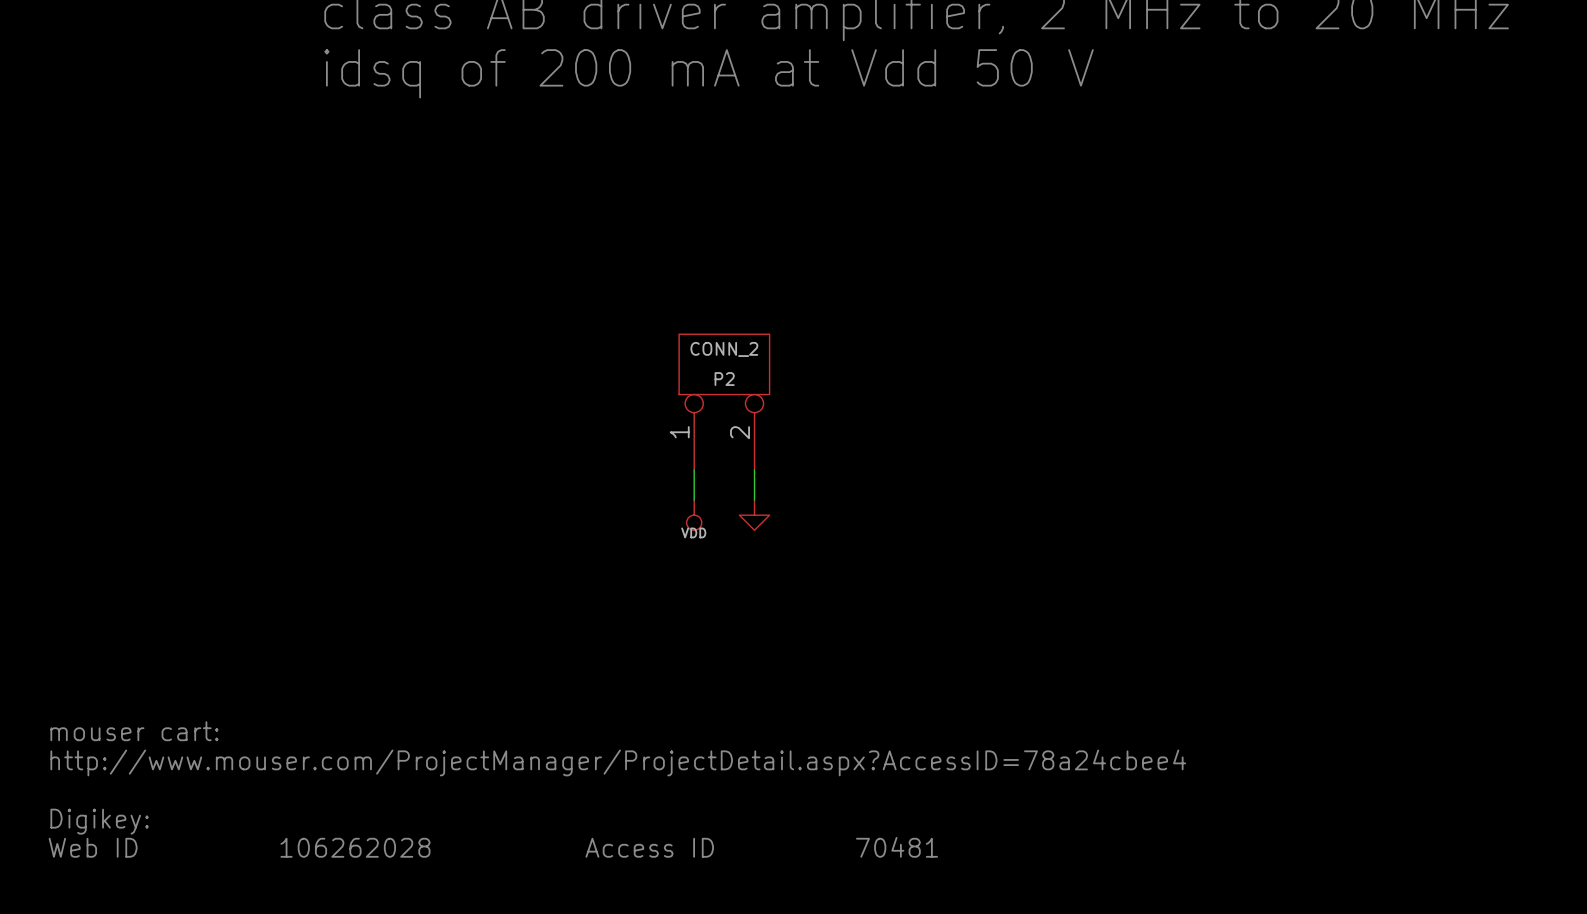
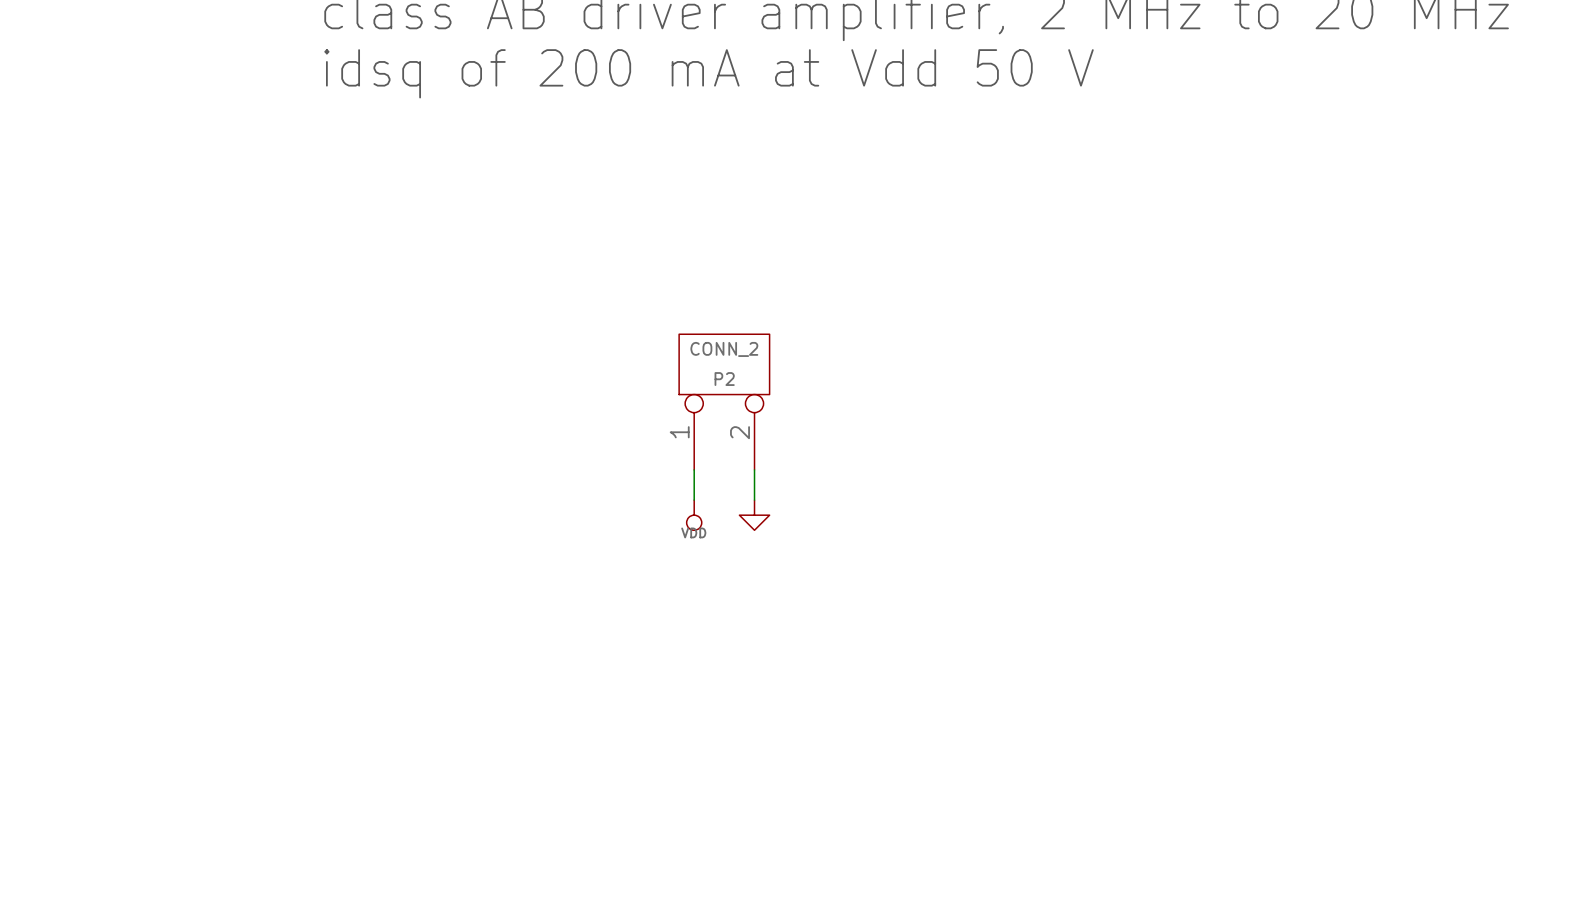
text: mouser cart: (134, 731) -> none
text: http://www.mouser.com/ProjectManager/ProjectDetail.aspx?AccessID=78a24cbee4 (618, 762) -> none
text: Digikey: (99, 821) -> none
text: Web ID 106262028 Access ID 70481 (493, 847) -> none

